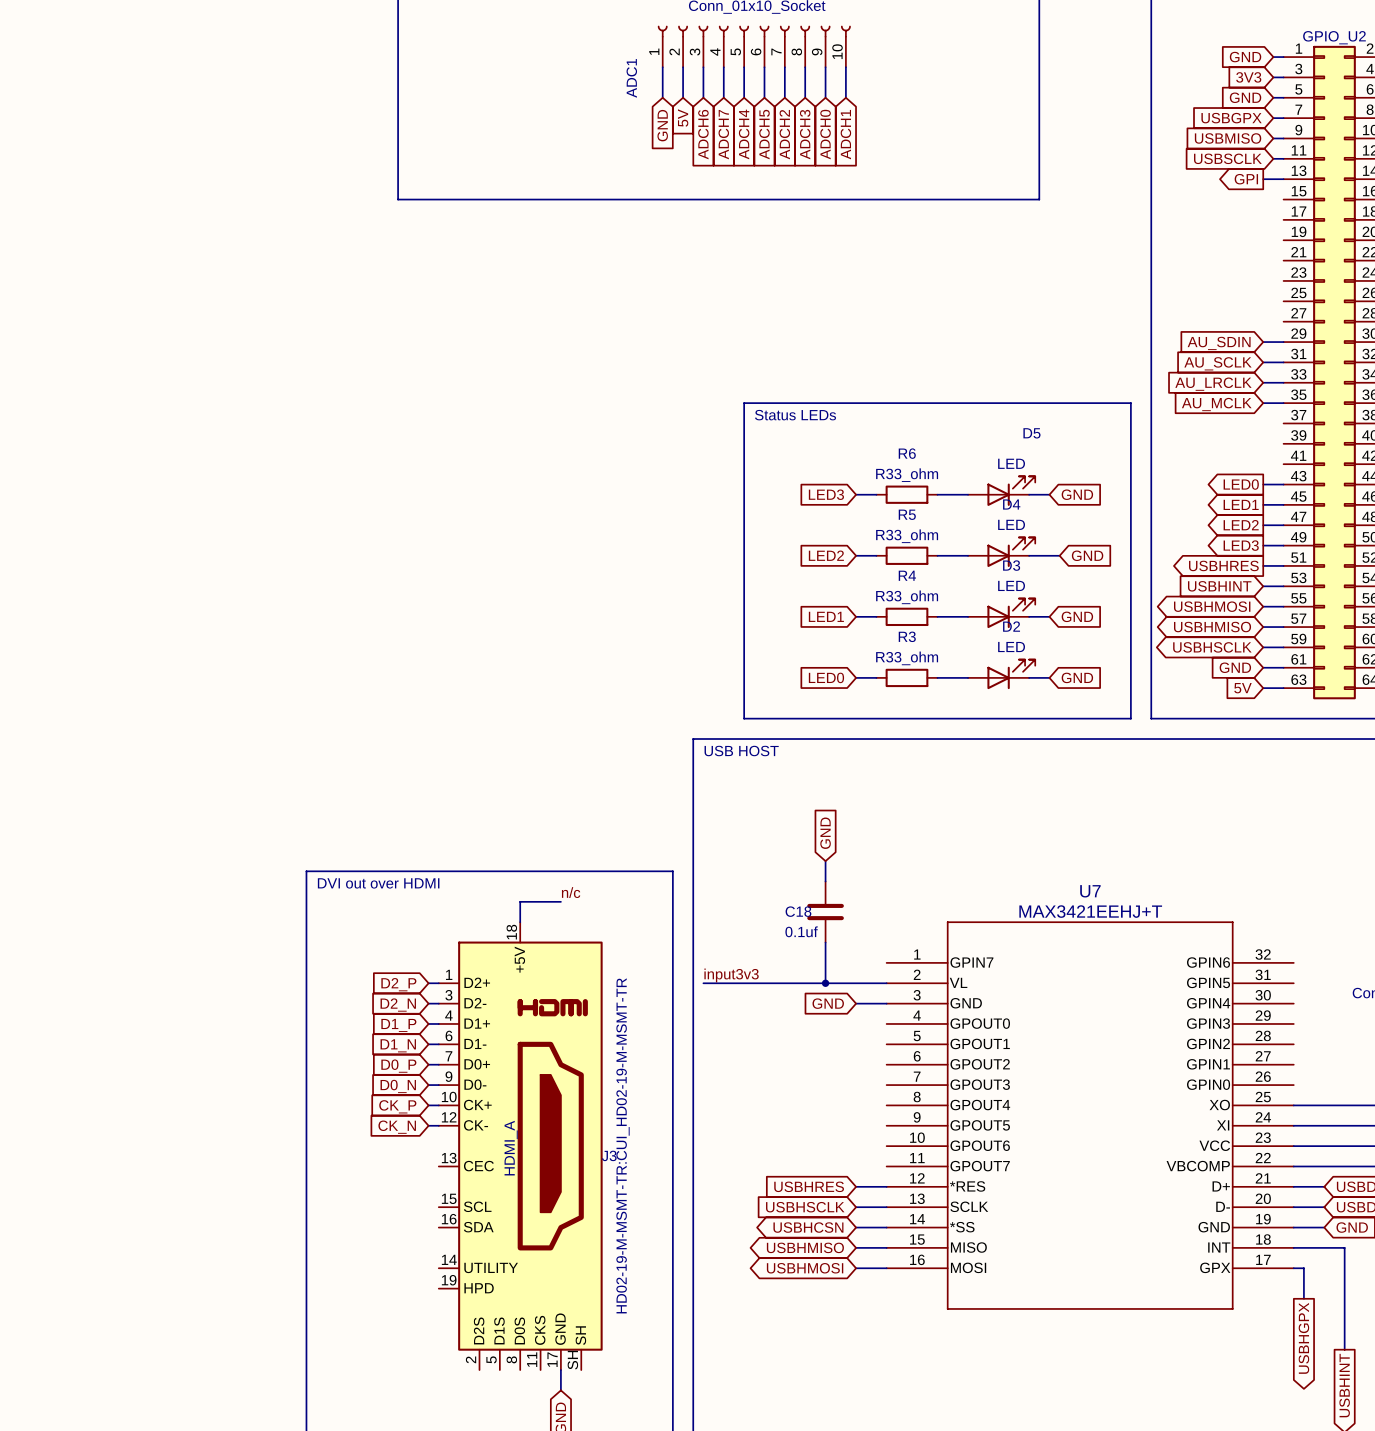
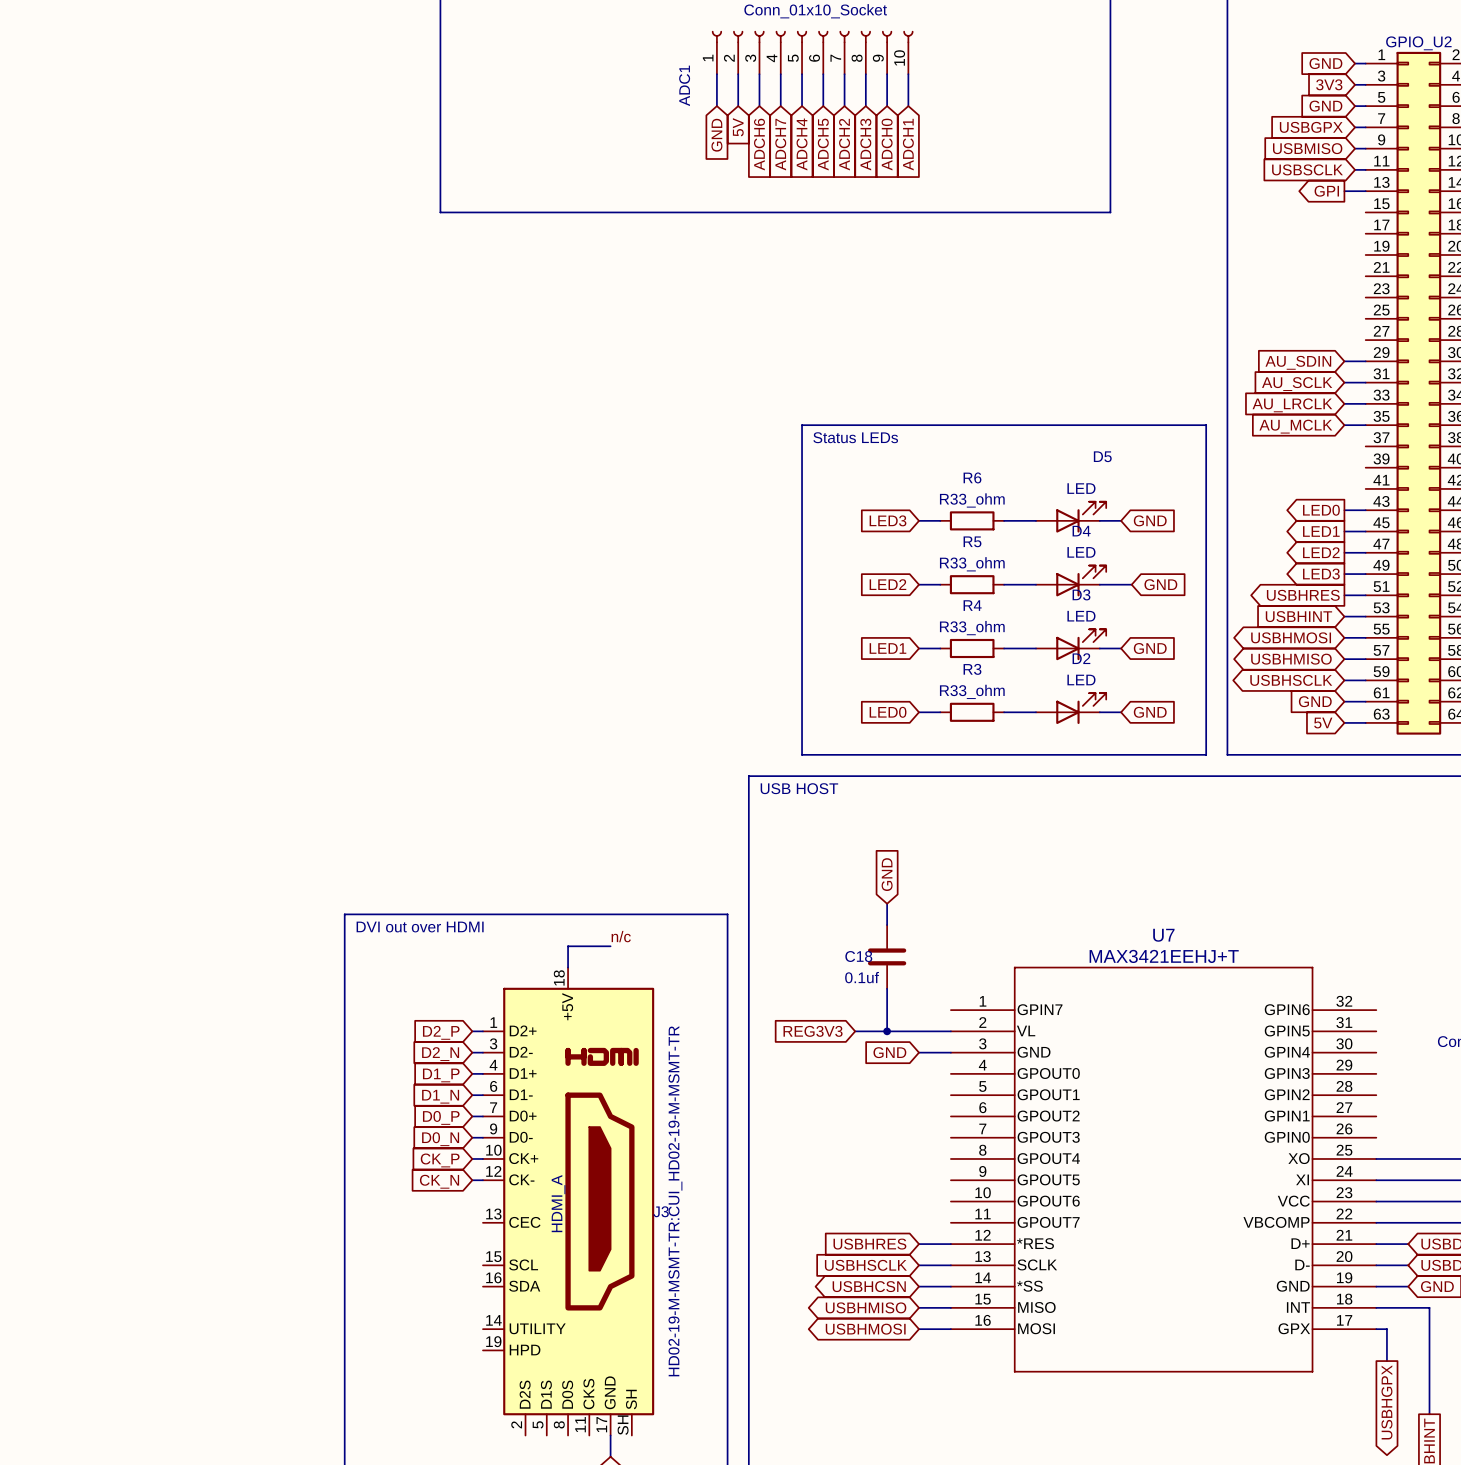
label: input3v3 (731, 975) -> none
wire: (703, 983) (795, 983) -> none
global label: none -> REG3V3 (813, 1031)

